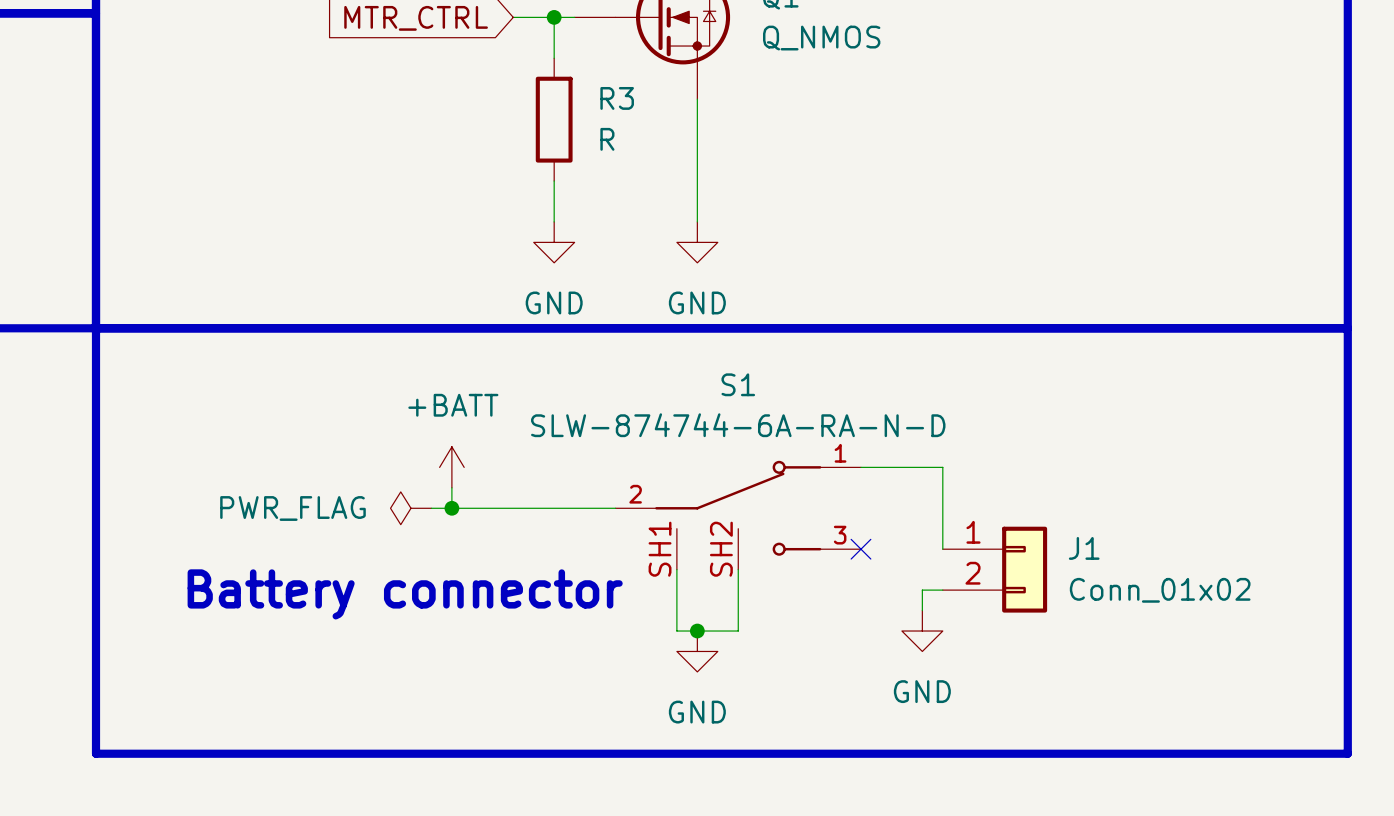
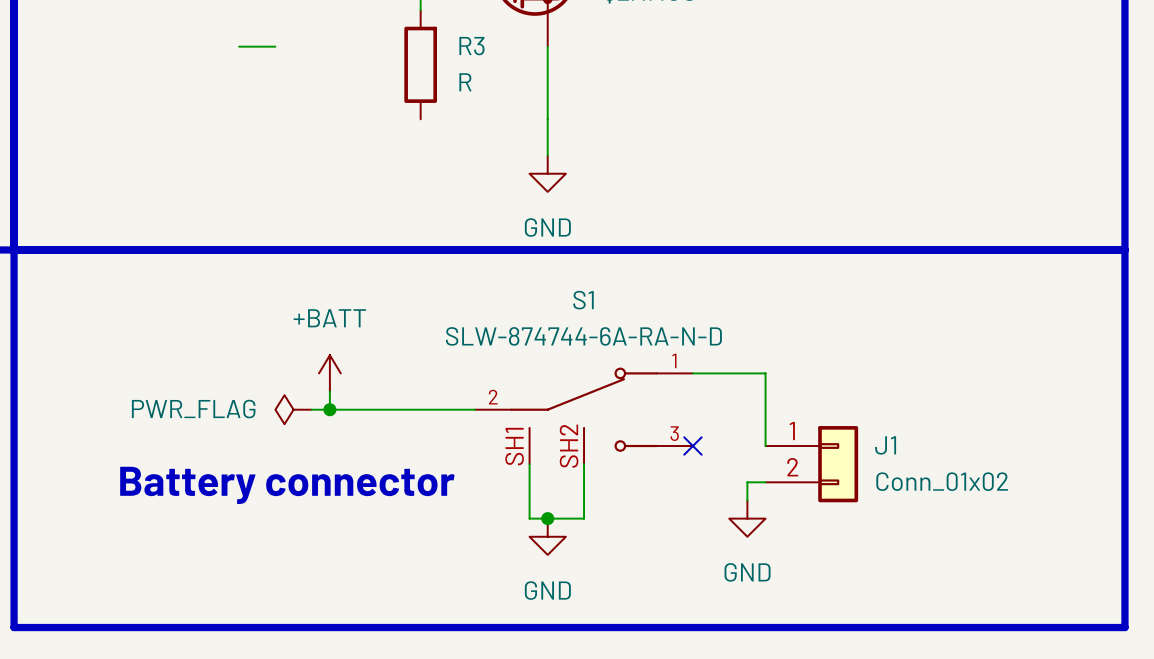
wire: none -> (239, 46) (275, 46)
wire: (554, 181) (554, 221) -> none
power symbol: GND (554, 242) -> none

